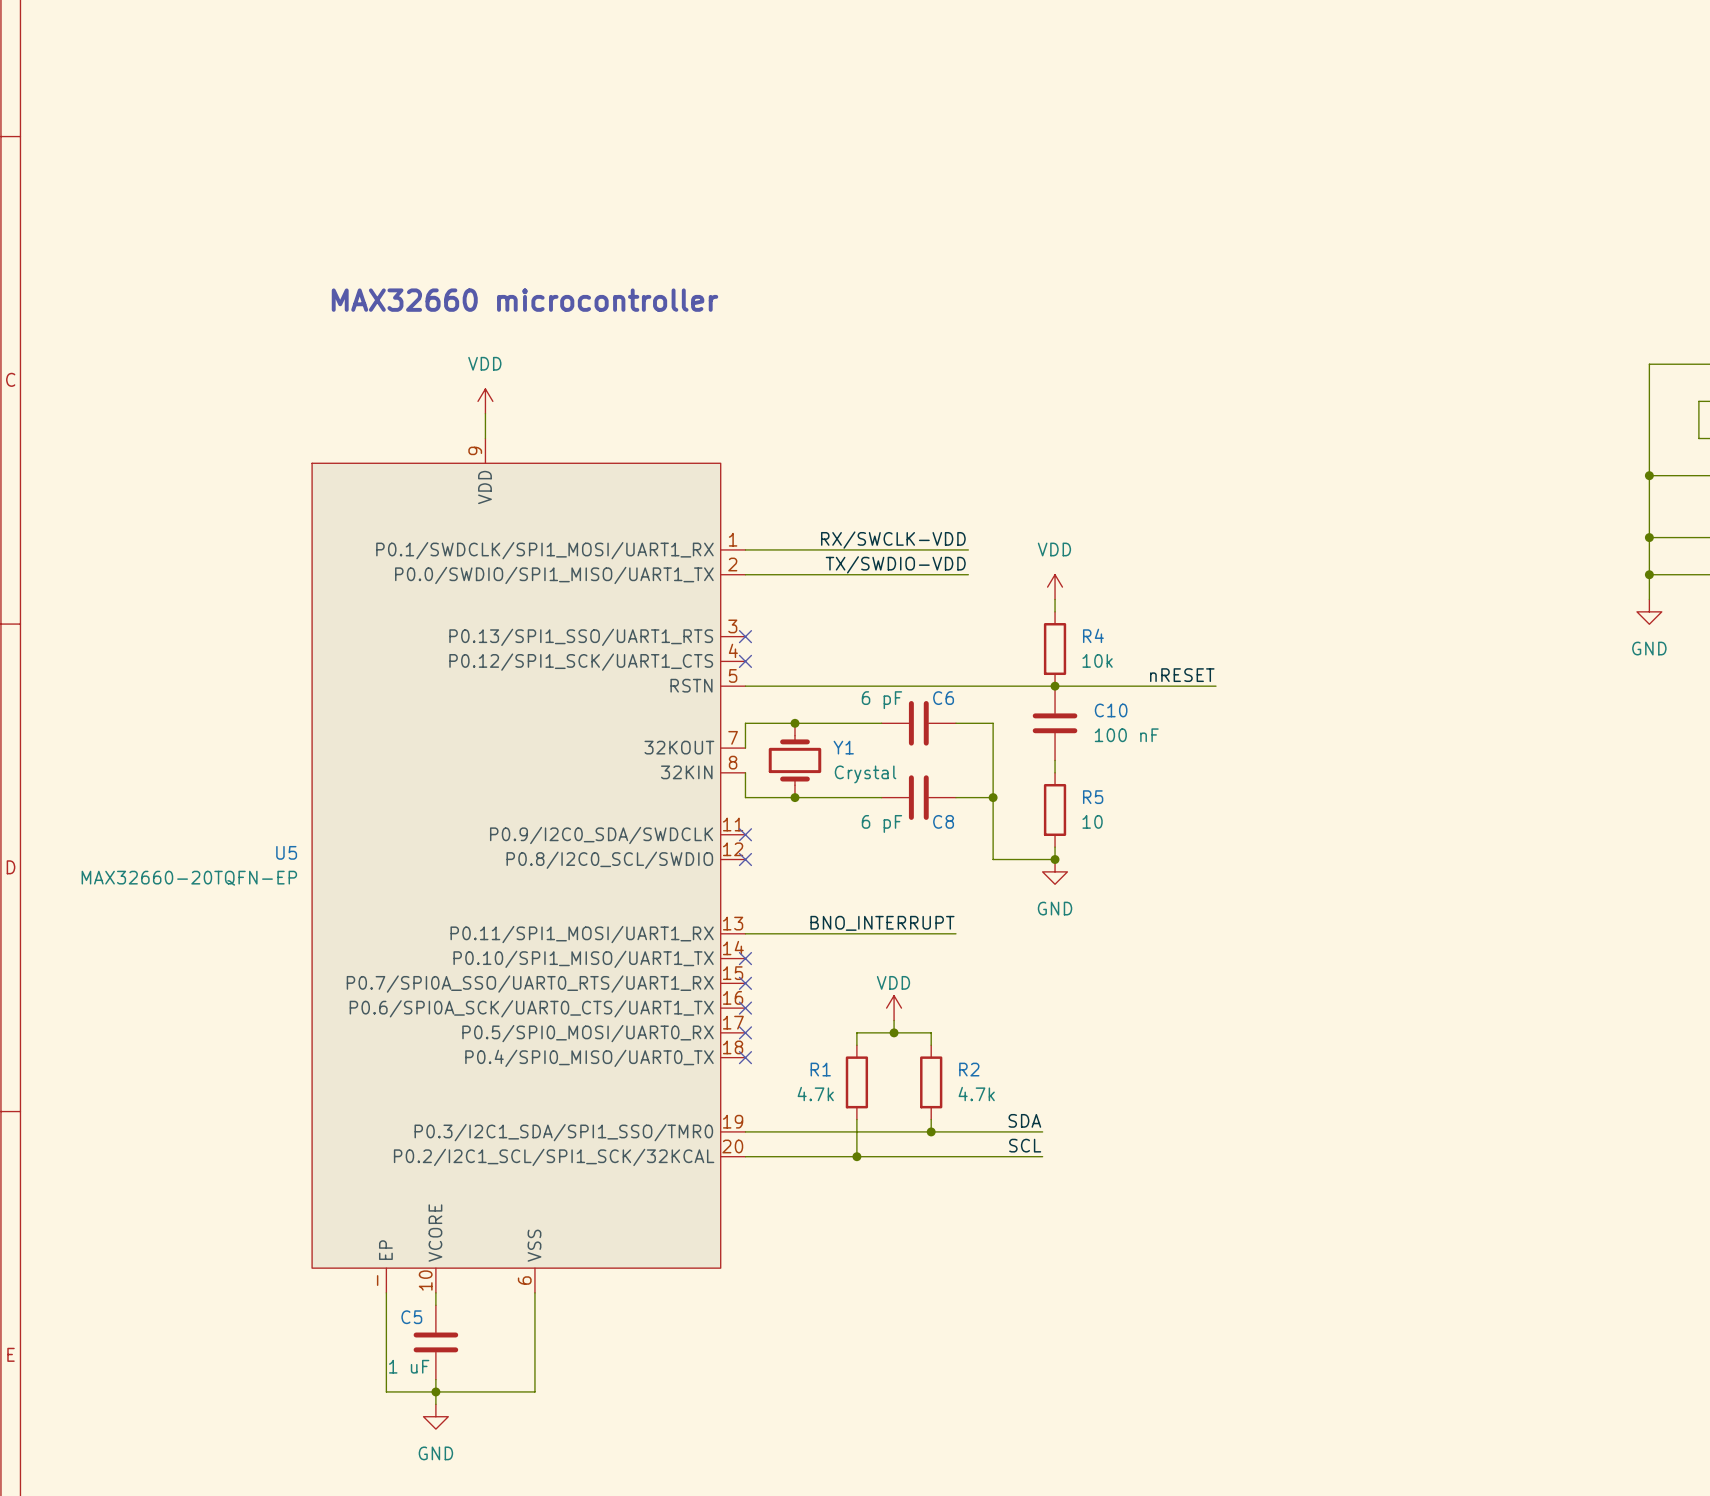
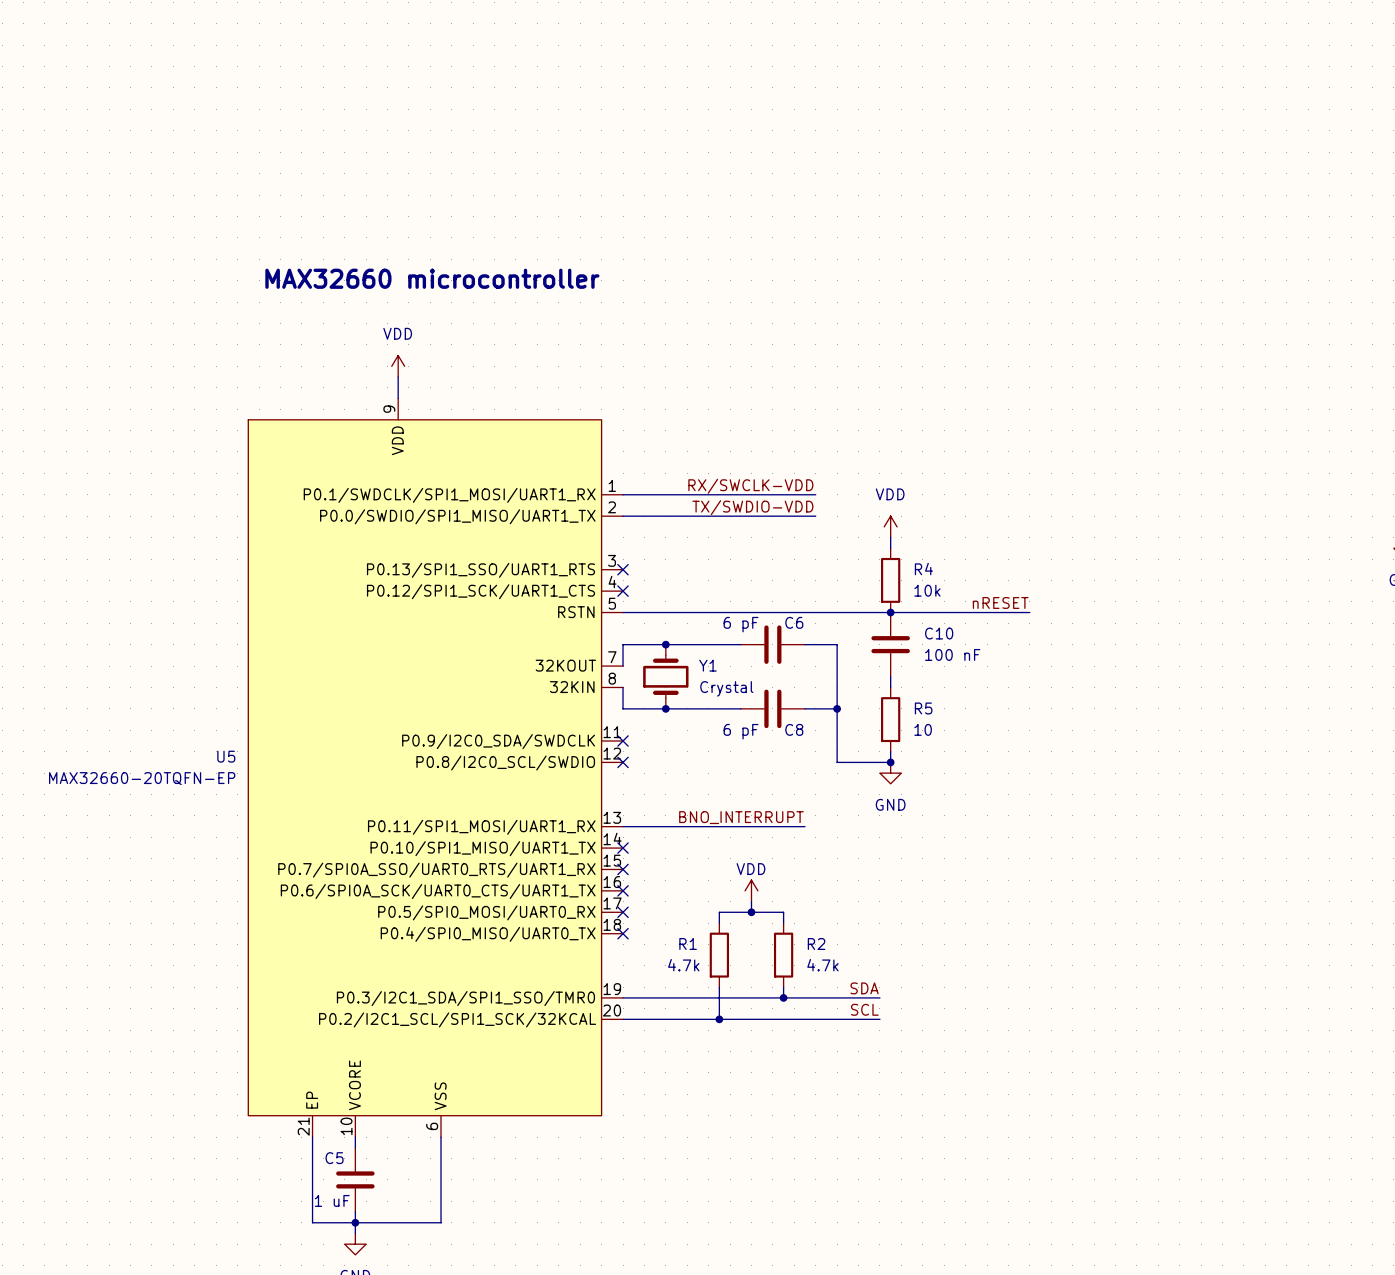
U5 pin number: - (377, 1280) -> 21 (303, 1126)

